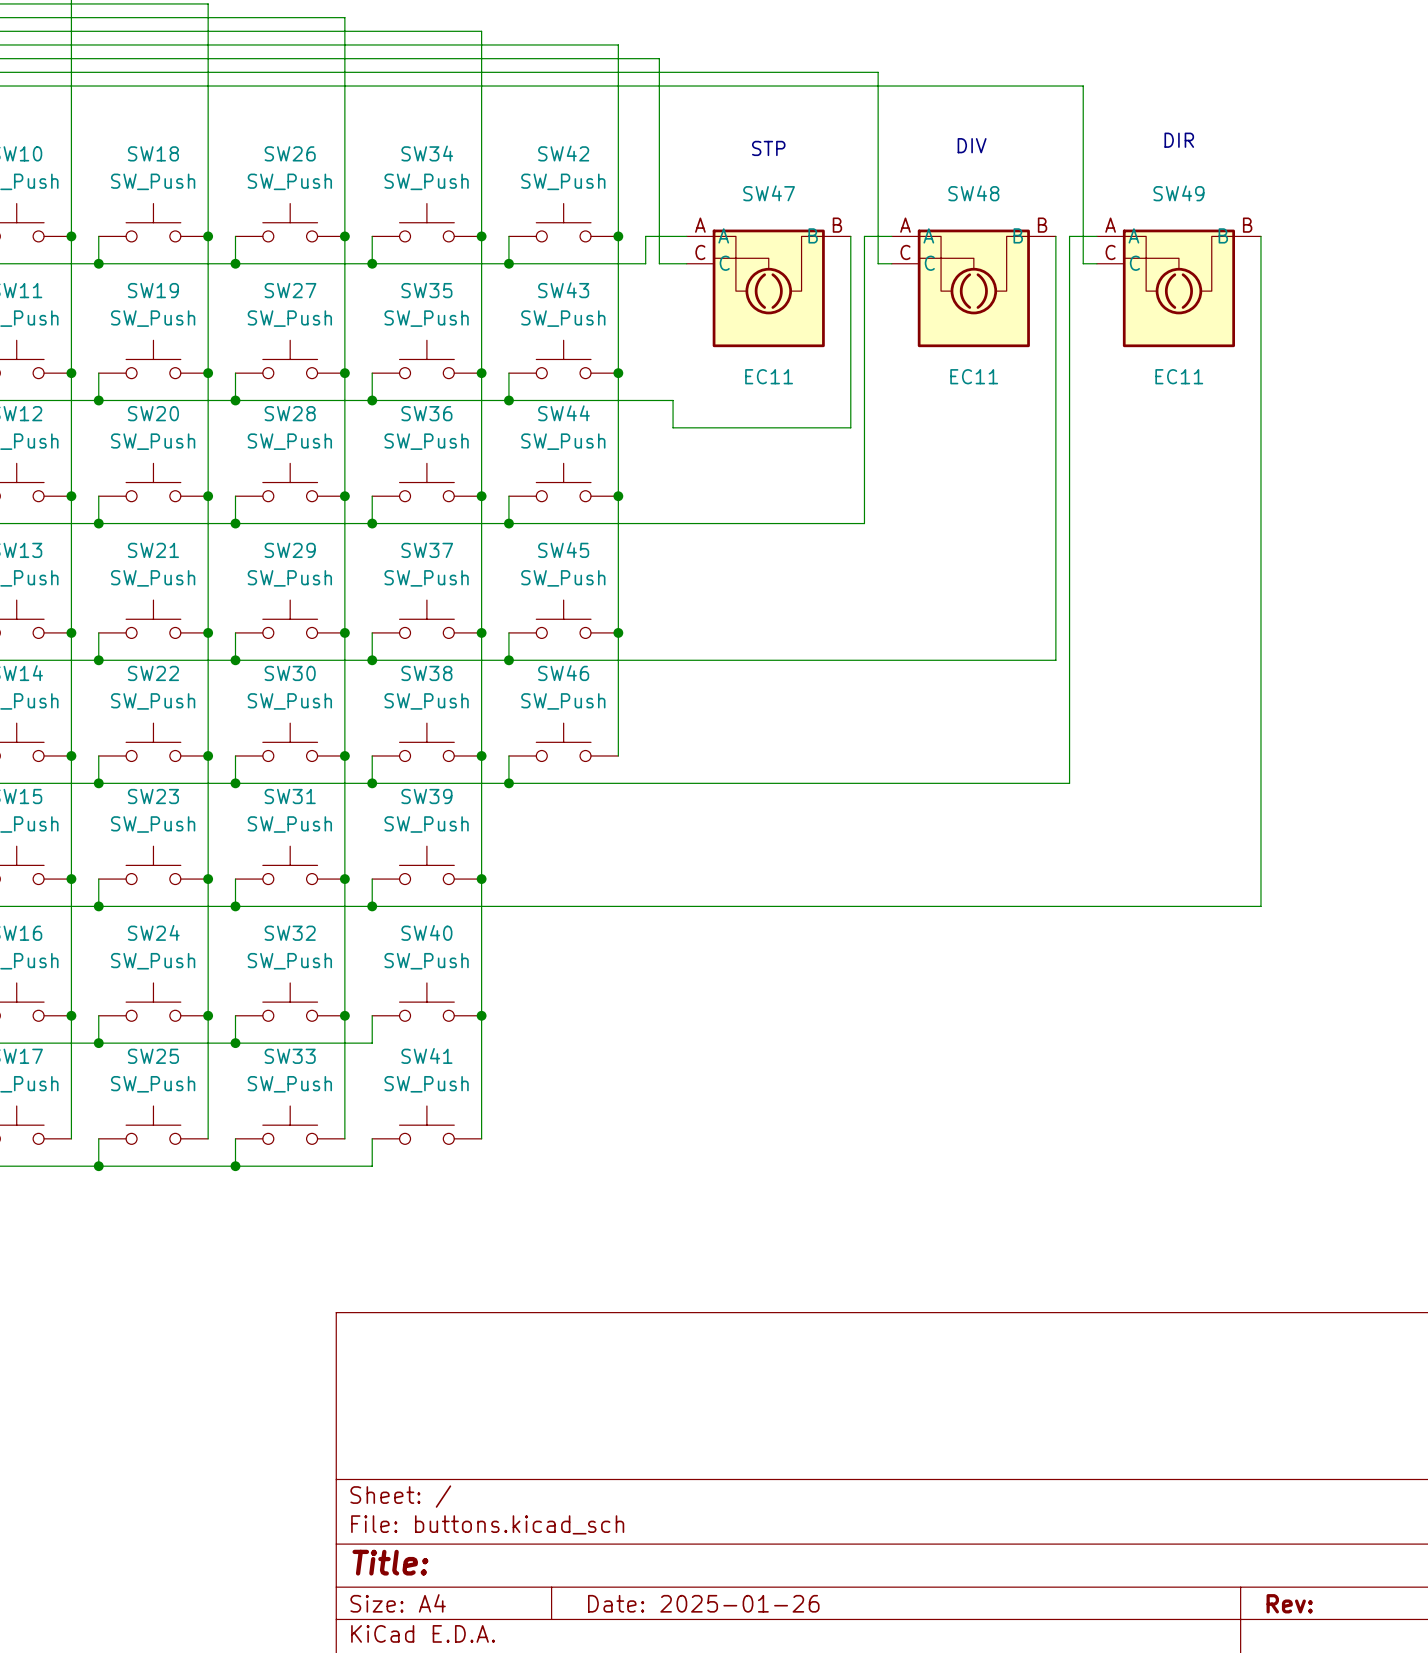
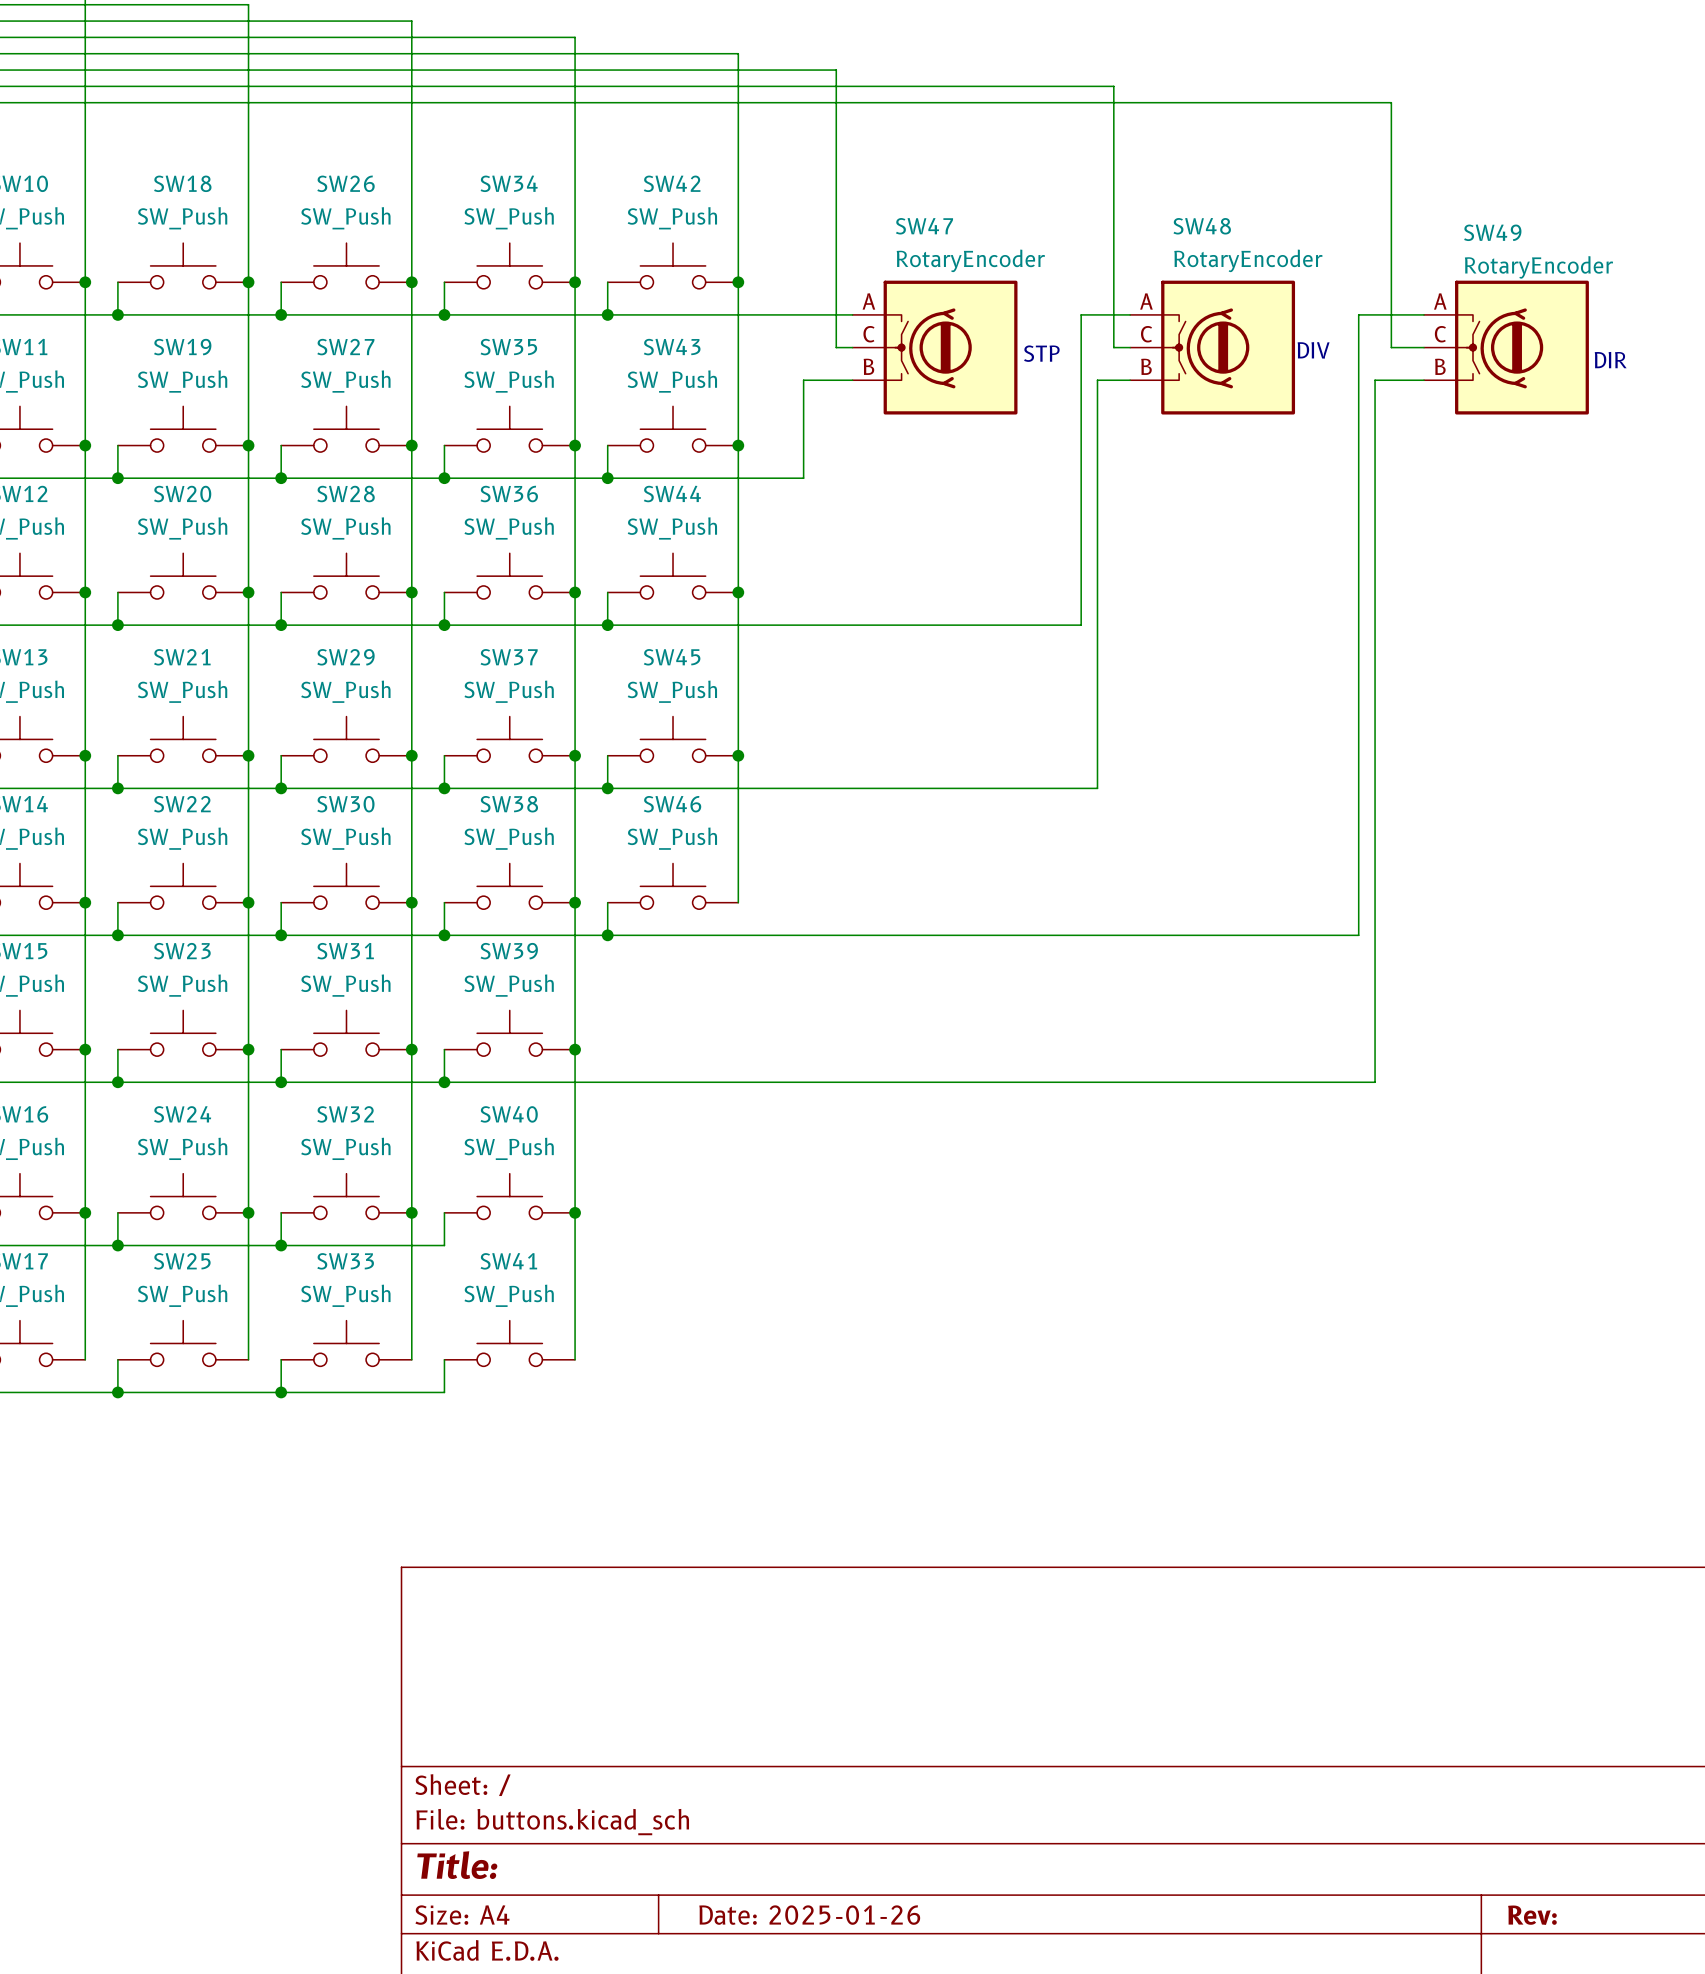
wire: (659, 58) (659, 263) -> (787, 70) (836, 70) (836, 347) (852, 347)
wire: (878, 72) (878, 263) (891, 263) -> (1048, 86) (1113, 86) (1113, 347) (1130, 347)
wire: (1083, 86) (1083, 263) (1096, 263) -> (1293, 102) (1391, 102) (1391, 347) (1424, 347)
text position: DIR (1179, 140) -> DIR (1610, 360)
text position: DIV (972, 145) -> DIV (1313, 350)
text position: STP (768, 148) -> STP (1041, 353)
SW47 symbol: [686, 229, 851, 348] -> [852, 280, 1018, 415]
SW48 symbol: [891, 229, 1056, 348] -> [1130, 280, 1296, 415]
SW49 symbol: [1096, 229, 1261, 348] -> [1424, 280, 1589, 415]
wire: (686, 236) (645, 236) (645, 263) -> (787, 314) (770, 314)
wire: (850, 236) (850, 427) (673, 427) (673, 400) -> (852, 380) (803, 380) (803, 478)
wire: (891, 236) (864, 236) (864, 523) -> (1130, 314) (1081, 314) (1081, 625) (1032, 625)
wire: (1055, 236) (1055, 660) (919, 660) -> (1130, 380) (1097, 380) (1097, 788)
wire: (1096, 236) (1069, 236) (1069, 783) -> (1424, 314) (1358, 314) (1358, 935) (1277, 935)
wire: (1260, 236) (1260, 906) (1151, 906) -> (1424, 380) (1375, 380) (1375, 1082)
SW47 value: EC11 (769, 376) -> RotaryEncoder (970, 260)
SW48 value: EC11 (974, 376) -> RotaryEncoder (1248, 260)
SW49 value: EC11 (1179, 376) -> RotaryEncoder (1538, 267)

